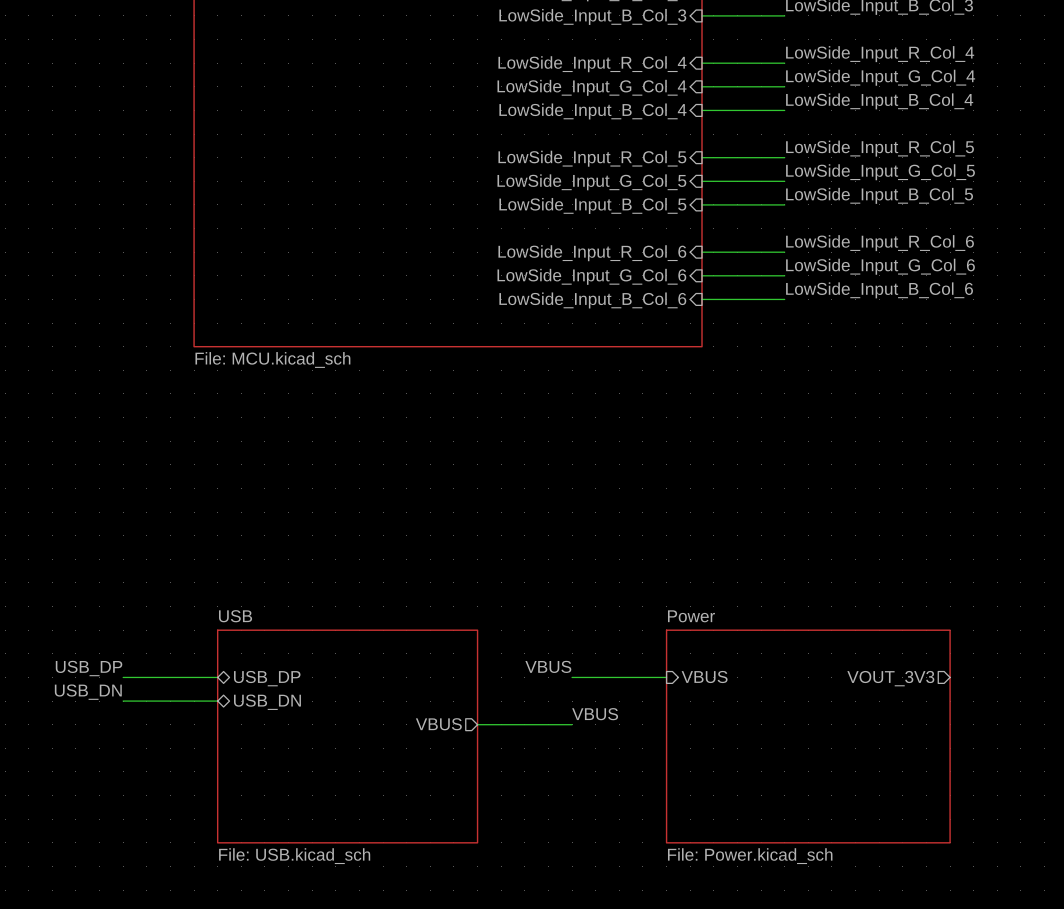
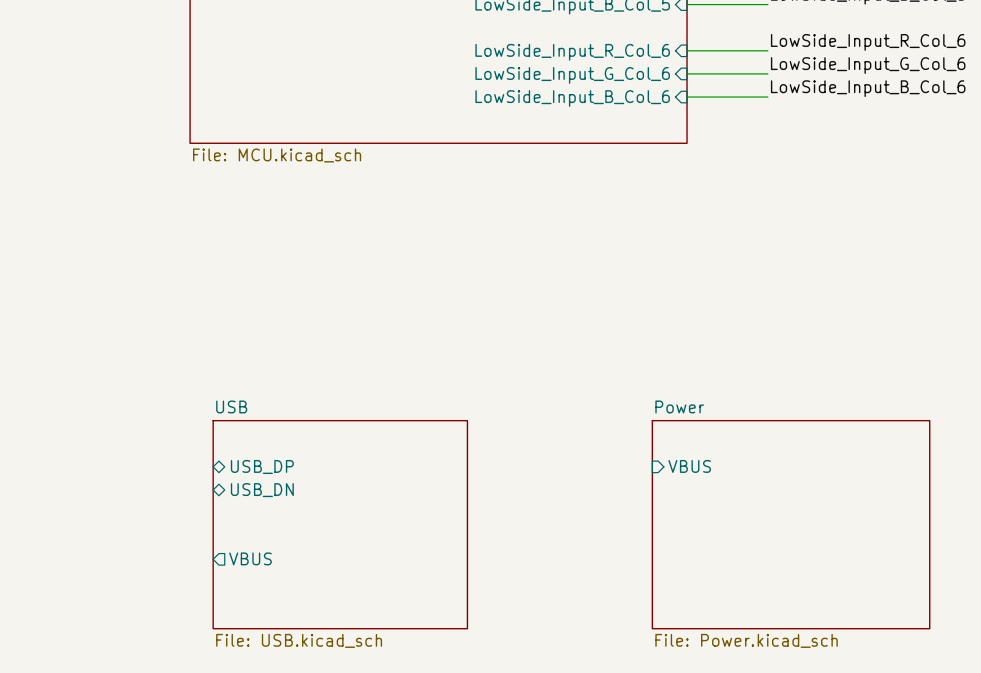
label: VBUS (548, 666) -> none
label: USB_DP (89, 668) -> none
wire: (123, 677) (217, 677) -> none
wire: (572, 677) (666, 677) -> none
sheet pin: VOUT_3V3 (890, 678) -> none
label: USB_DN (88, 692) -> none
wire: (123, 701) (217, 701) -> none
label: VBUS (595, 714) -> none
sheet pin: VBUS (438, 724) -> none
wire: (477, 724) (572, 724) -> none
sheet pin: none -> VBUS (250, 558)

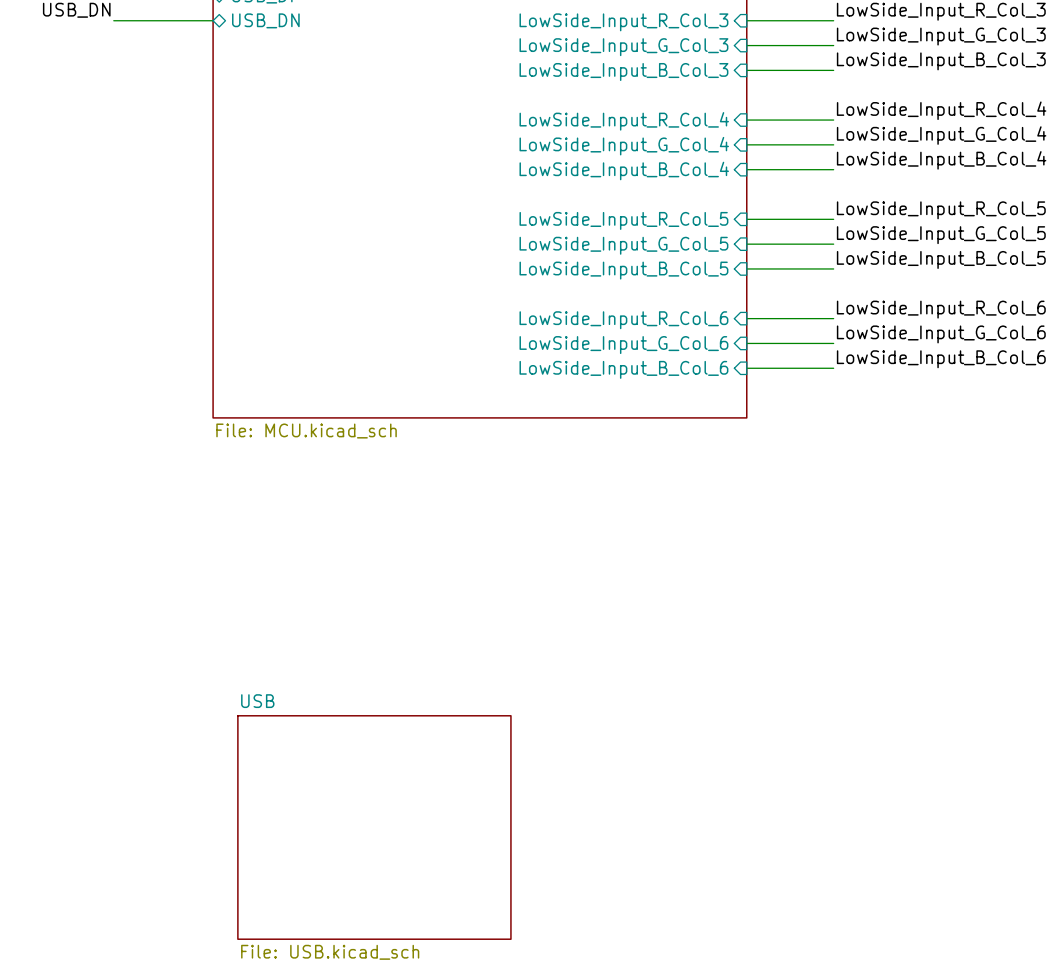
sheet pin: USB_DP (262, 466) -> none
sheet pin: VBUS (689, 466) -> none
sheet pin: USB_DN (262, 490) -> none
sheet Power: File: Power.kicad_sch (791, 524) -> none
sheet pin: VBUS (250, 558) -> none

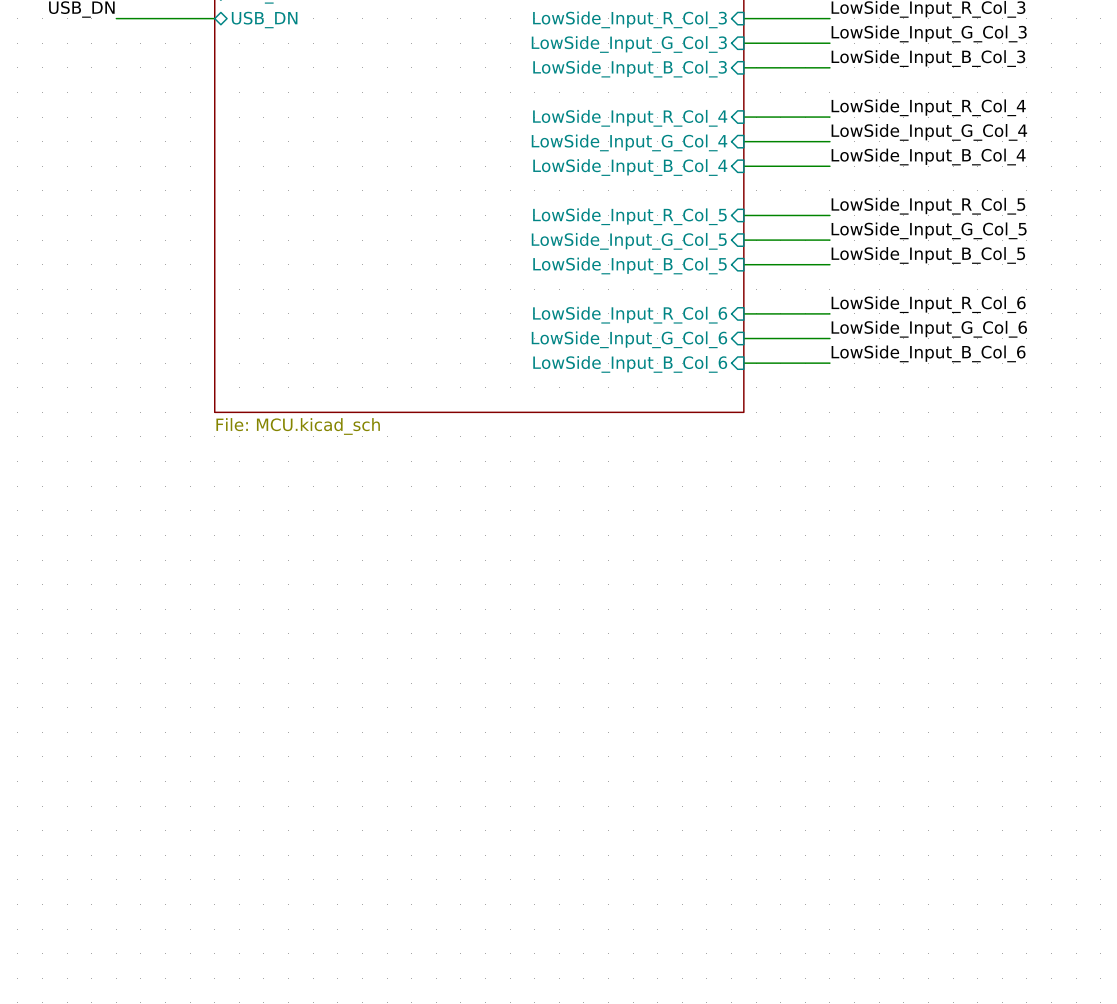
sheet USB: File: USB.kicad_sch (374, 827) -> none

